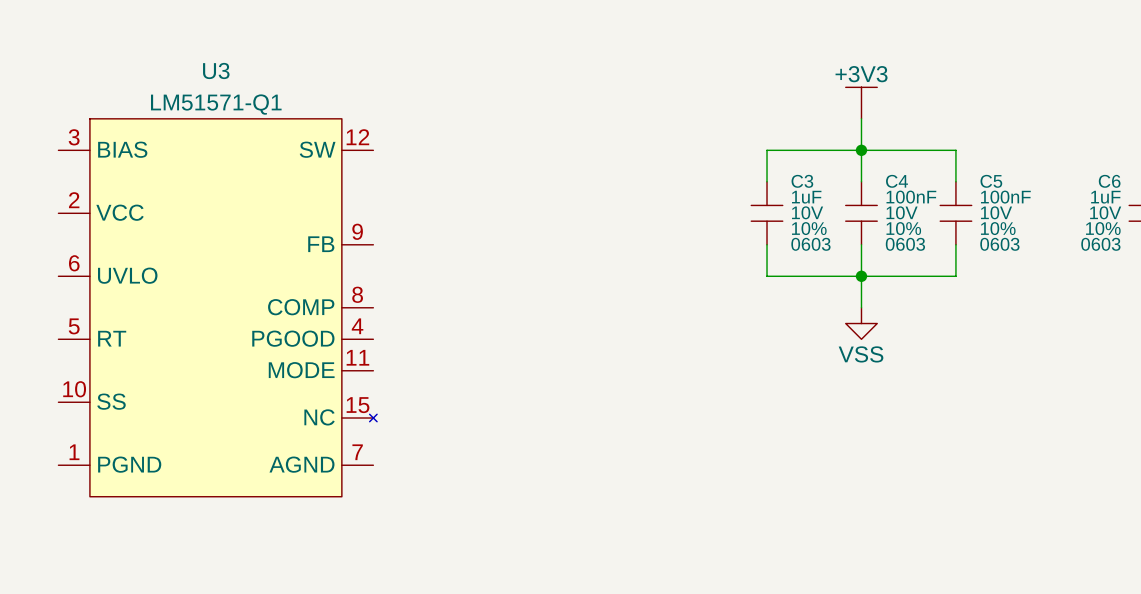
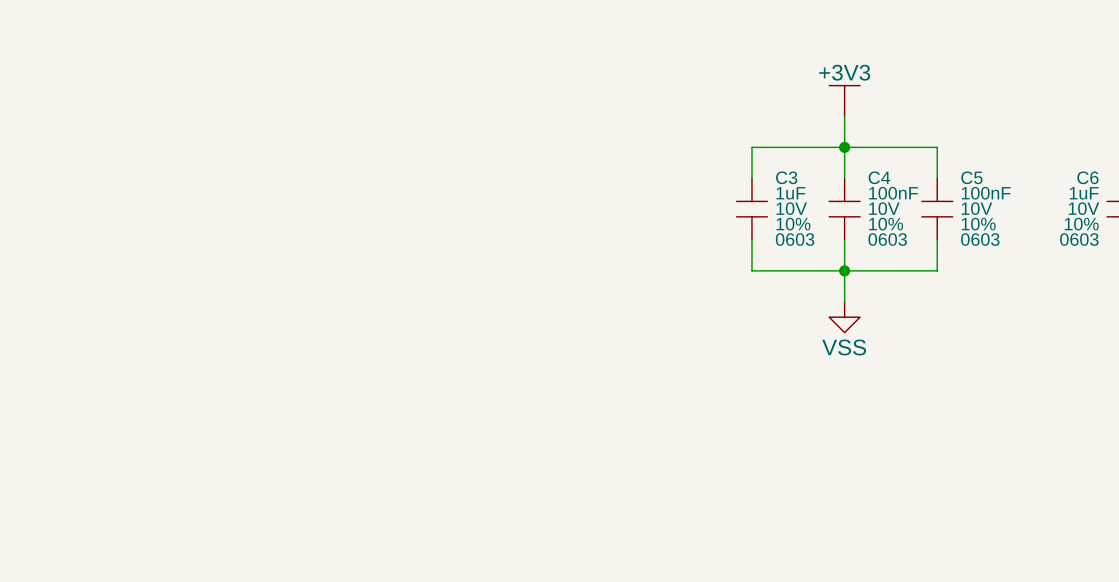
U3: LM51571-Q1 (217, 307) -> none

